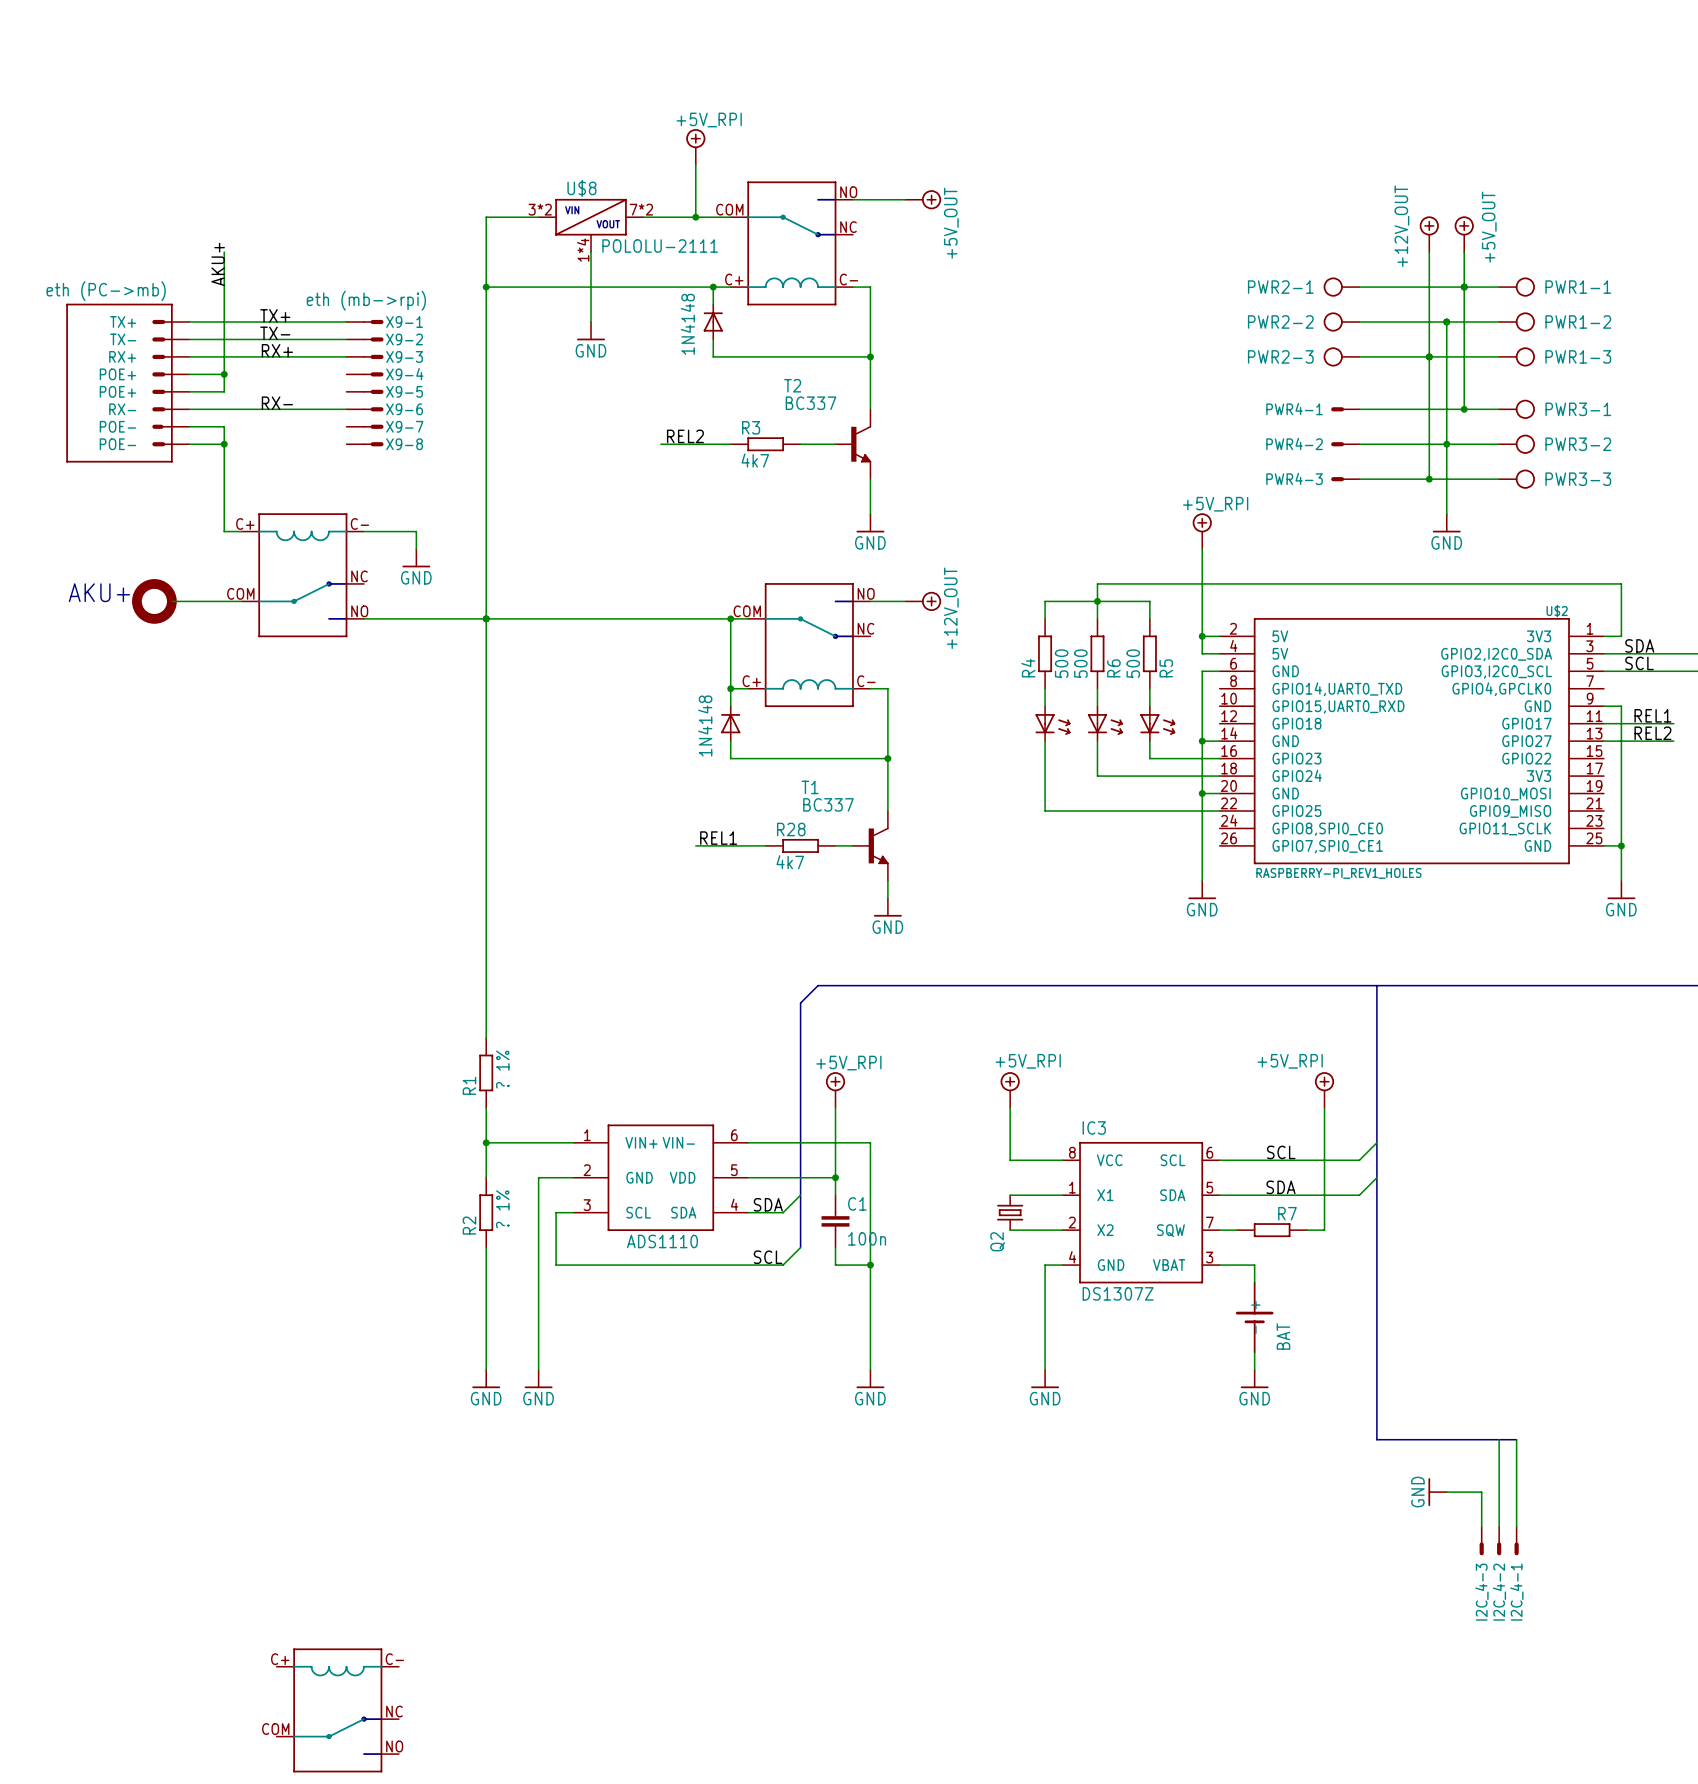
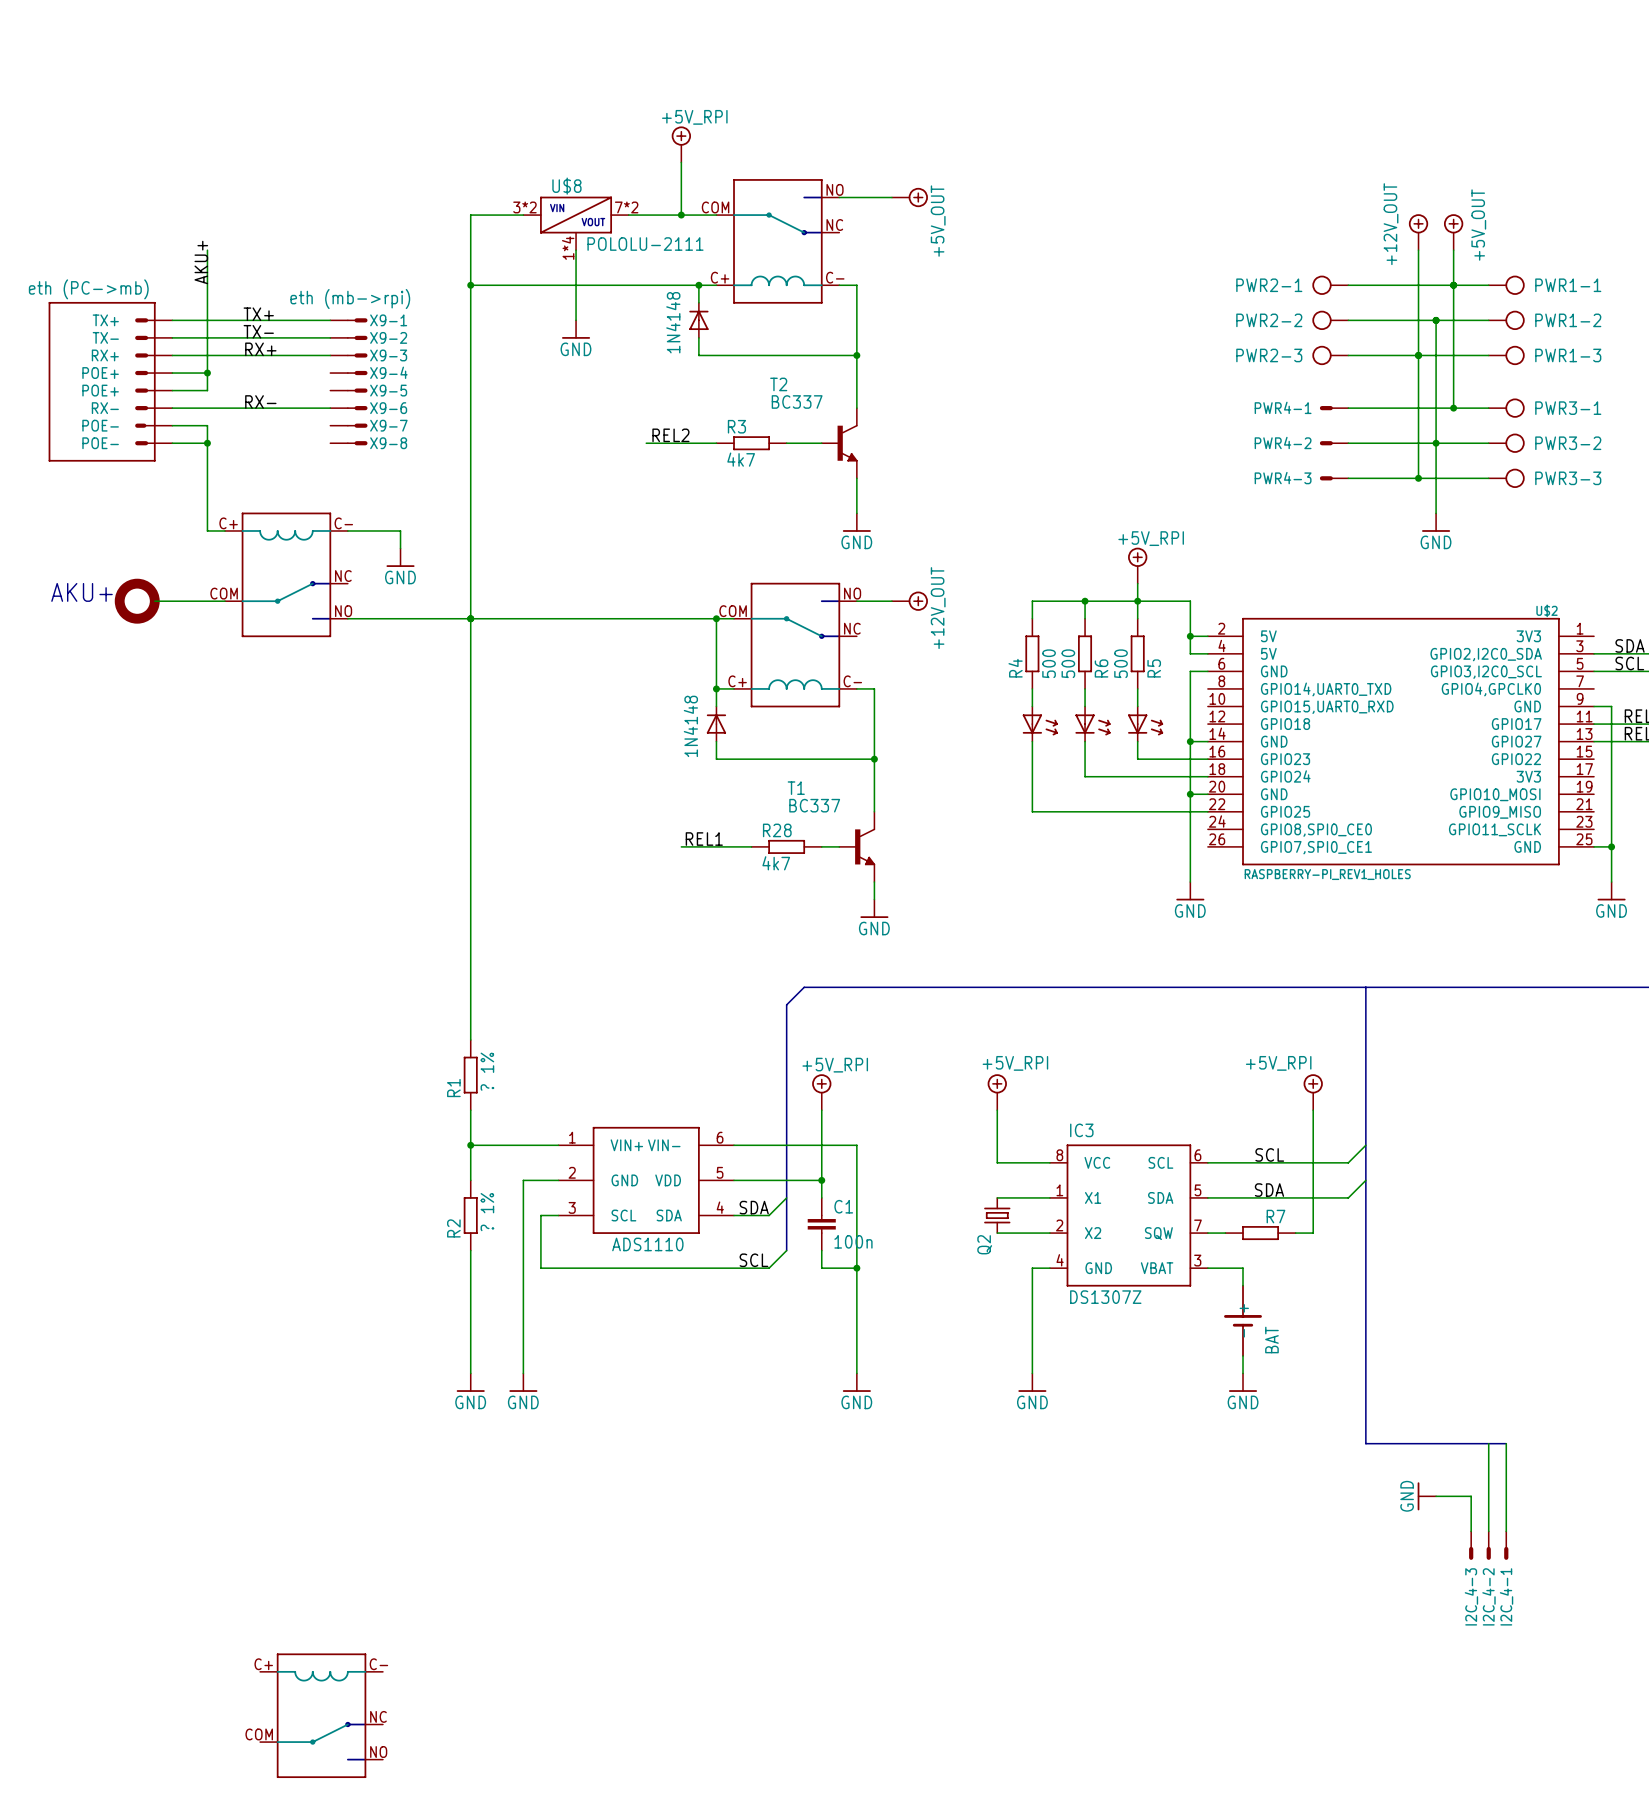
power symbol position: +5V_RPI (1202, 531) -> +5V_RPI (1137, 565)
wire: (1202, 549) (1202, 601) -> (1137, 583) (1137, 601) (1190, 601)
wire: (1097, 601) (1097, 583) (1621, 583) (1621, 636) (1603, 636) -> none
junction: none -> (1137, 601)

